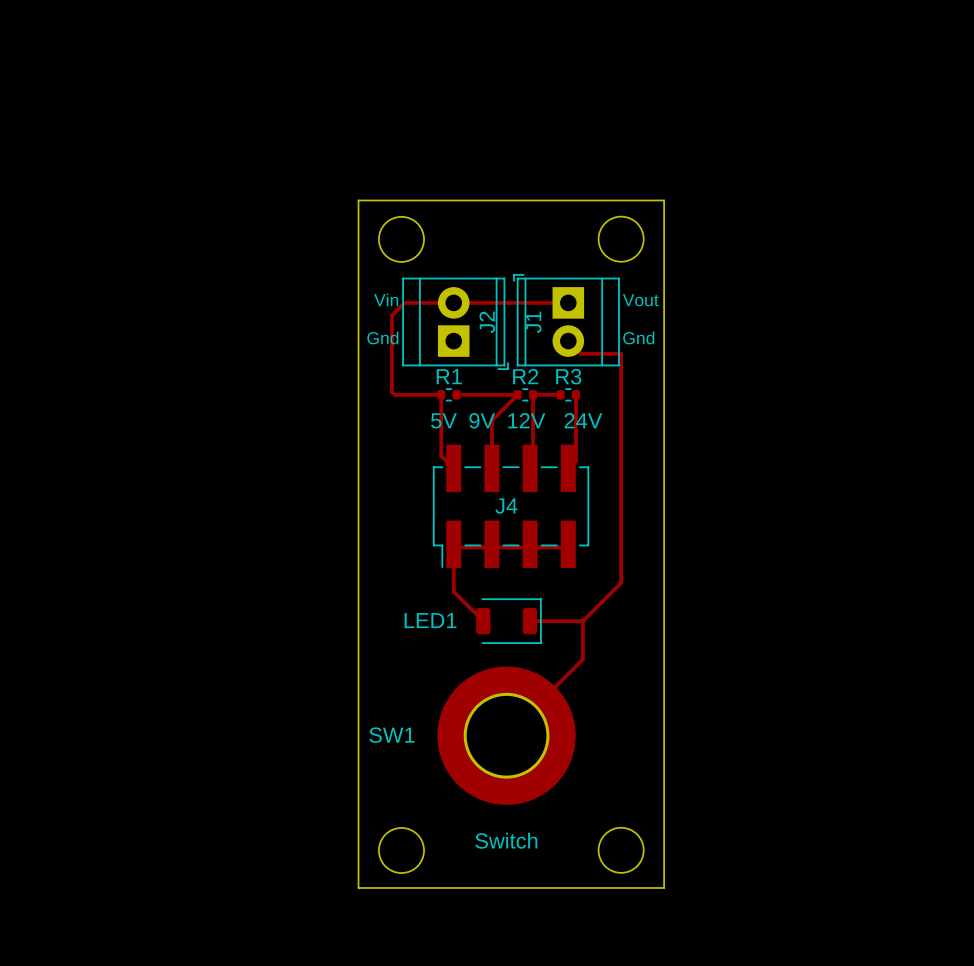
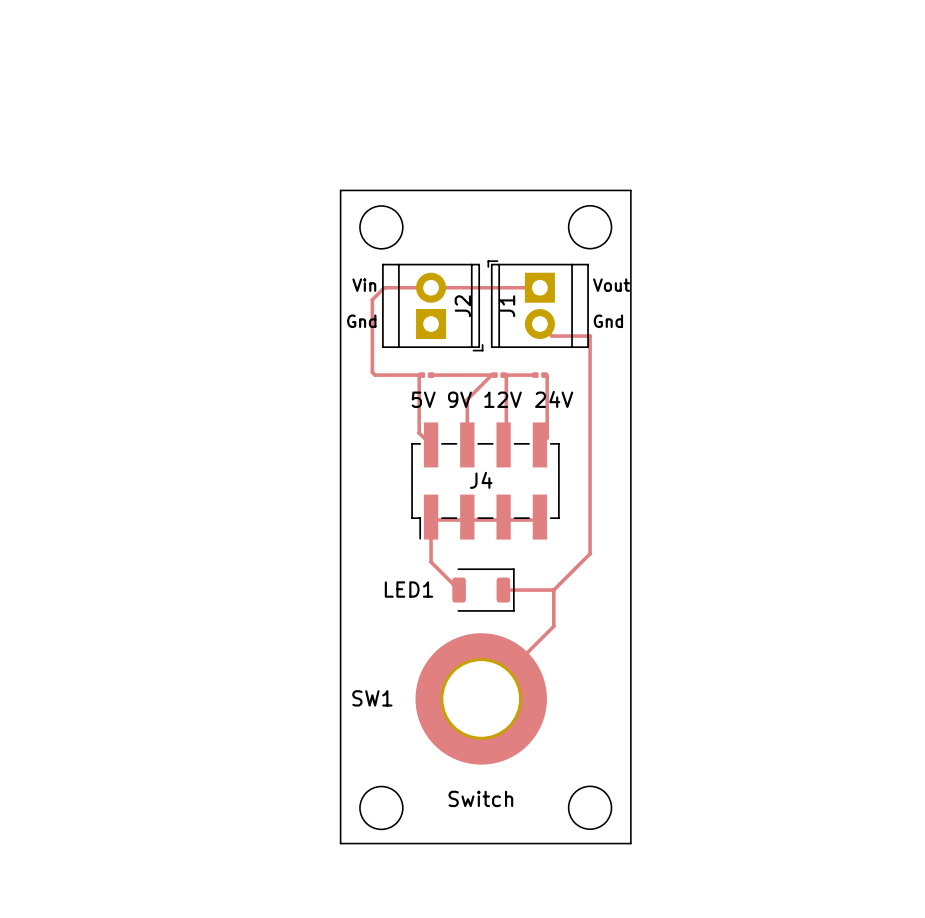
R1: (448, 394) -> none
part: none -> (426, 375)
R2: (525, 394) -> none
part: none -> (499, 375)
R3: (568, 394) -> none
part: none -> (539, 375)

